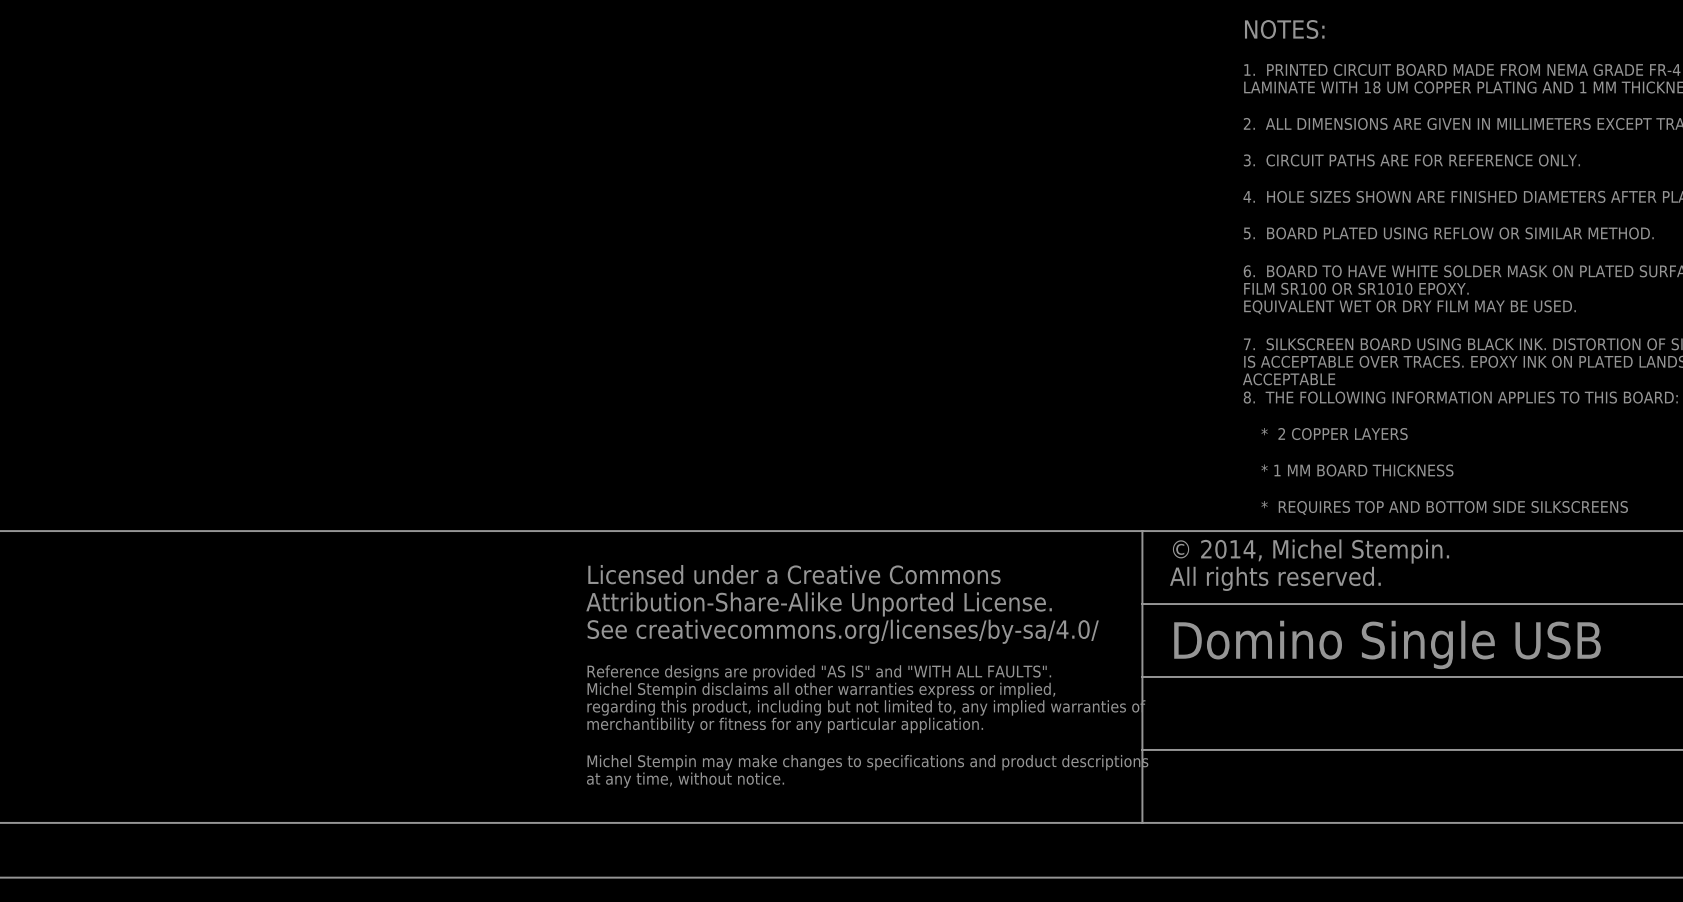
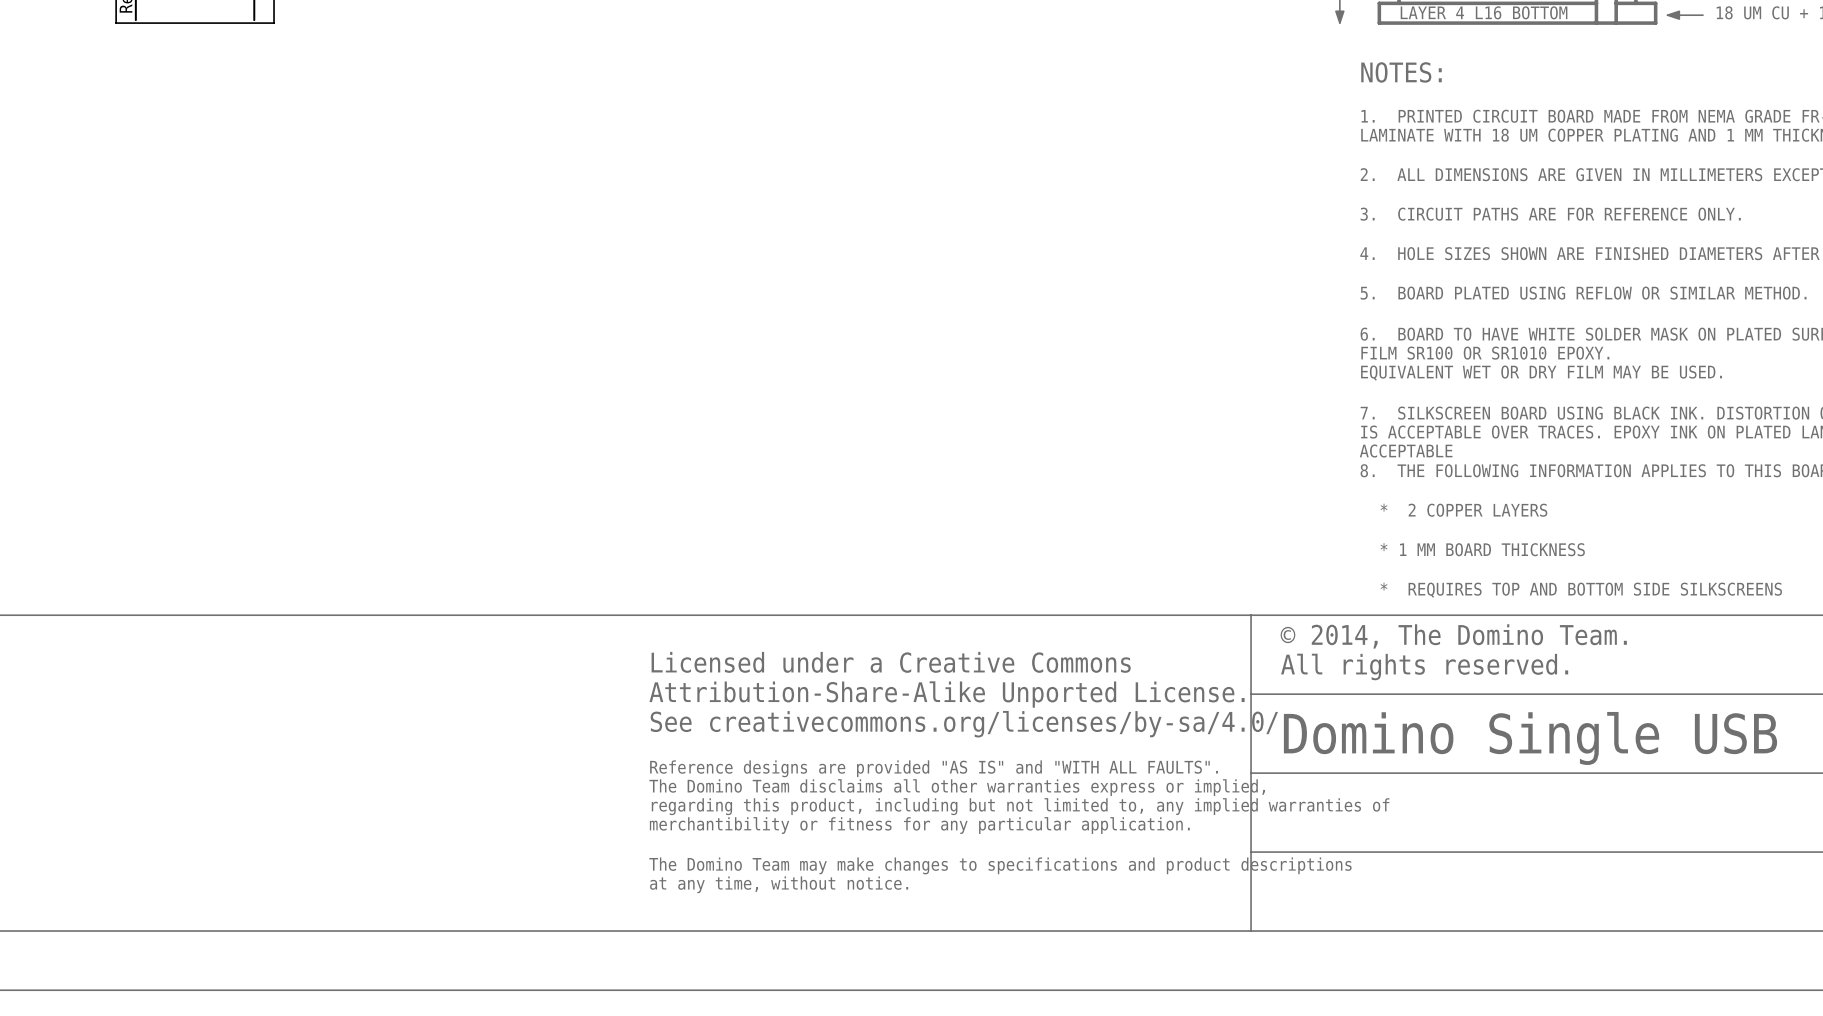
text: © 2014, Michel Stempin. (1311, 551) -> © 2014, The Domino Team. (1453, 636)
text: Michel Stempin disclaims all other warranties express or implied, (821, 690) -> The Domino Team disclaims all other warranties express or implied, (957, 787)
text: Michel Stempin may make changes to specifications and product descriptions (867, 762) -> The Domino Team may make changes to specifications and product descriptions (1000, 865)

